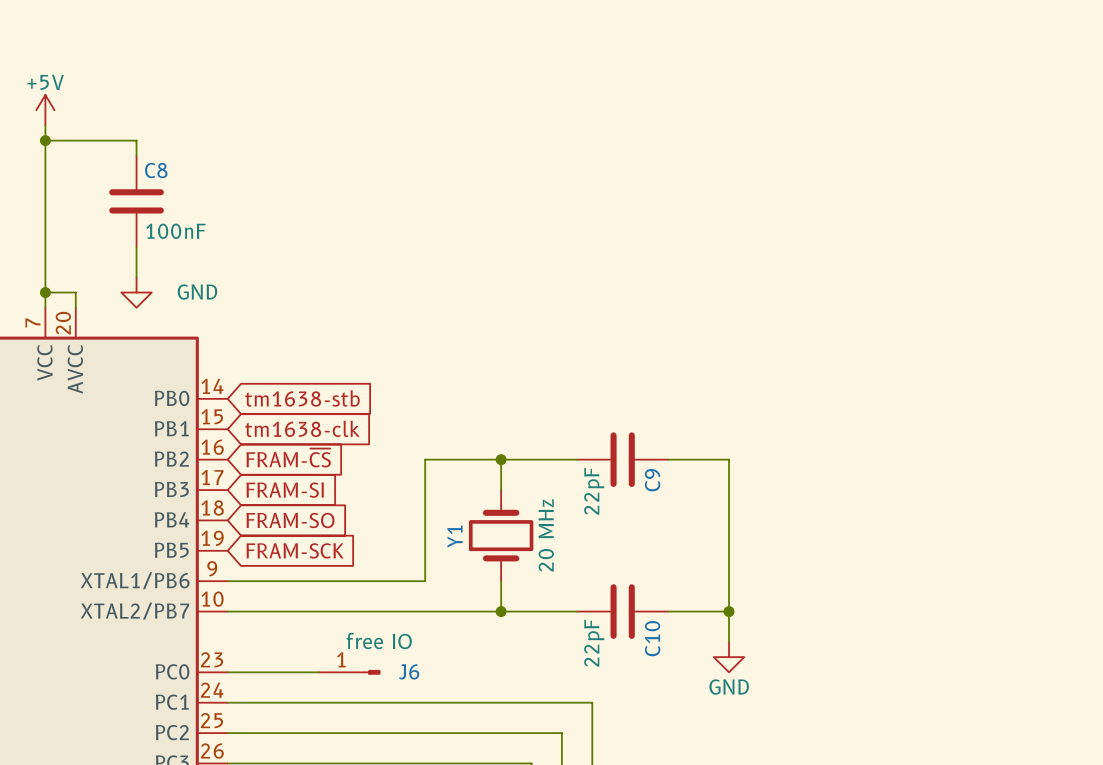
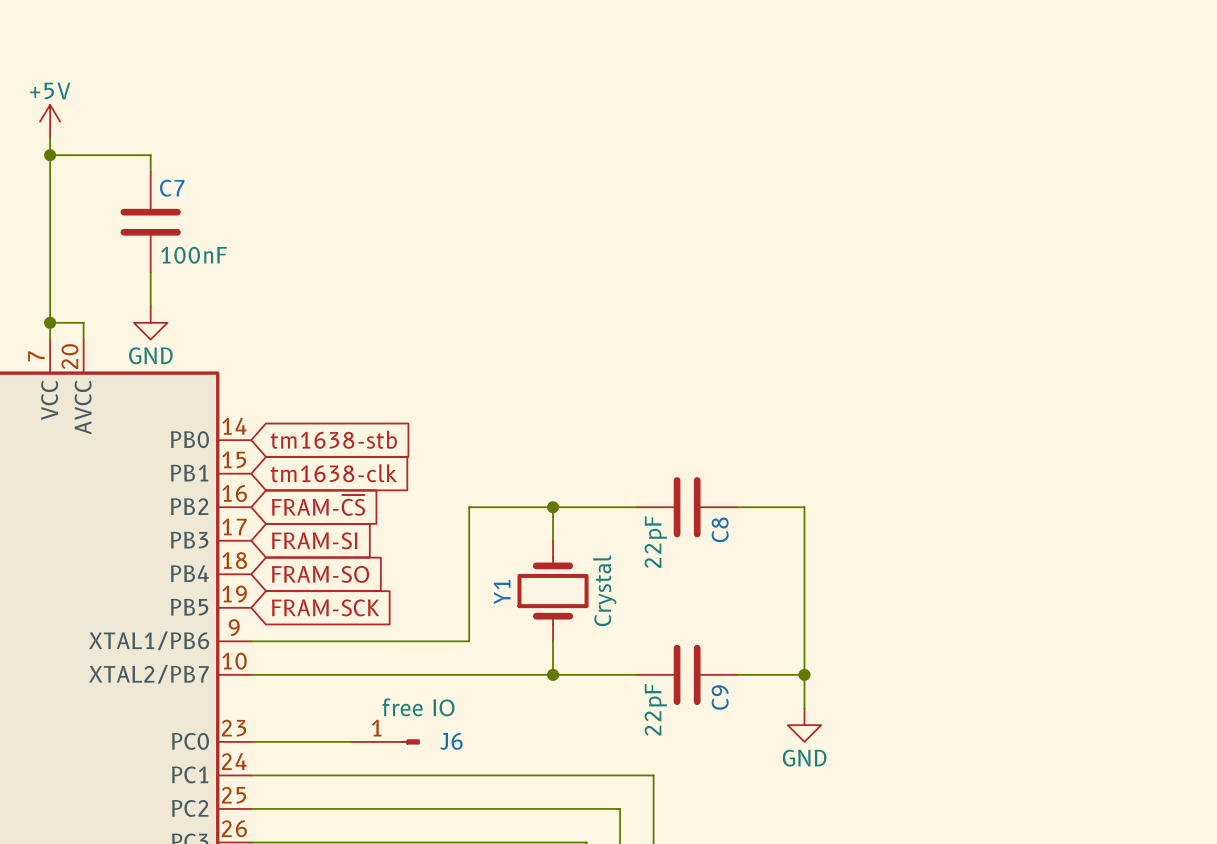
C8 name: C8 (156, 170) -> C7 (172, 188)
power symbol text position: GND (197, 292) -> GND (150, 355)
C9 name: C9 (652, 480) -> C8 (720, 529)
Y1 value: 20 MHz (546, 535) -> Crystal (604, 590)
C10 name: C10 (652, 638) -> C9 (720, 697)

